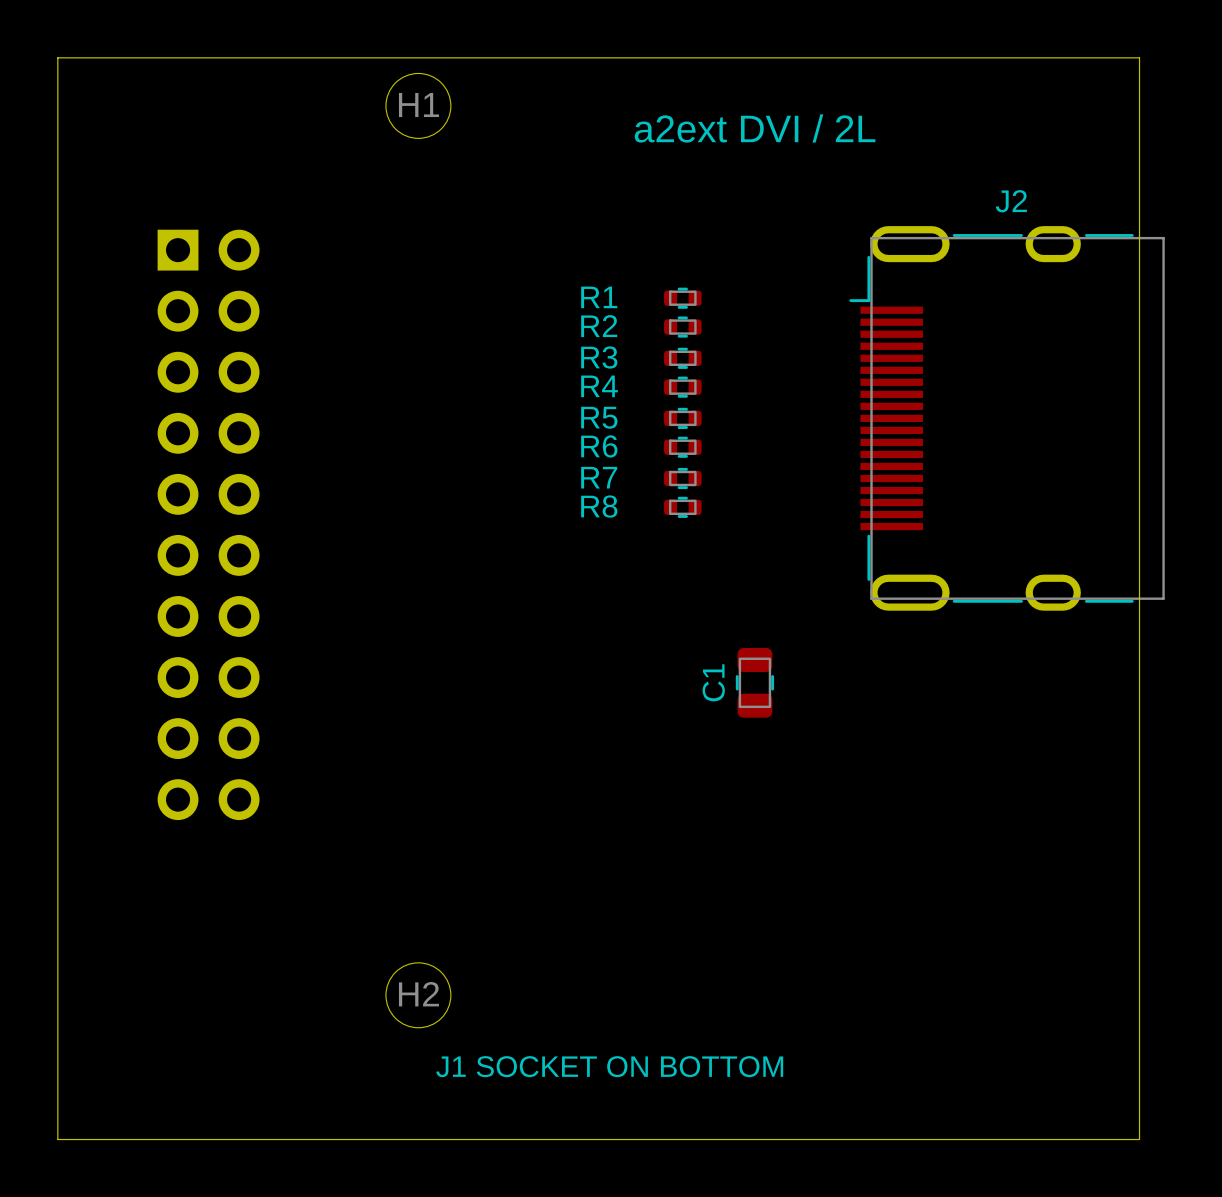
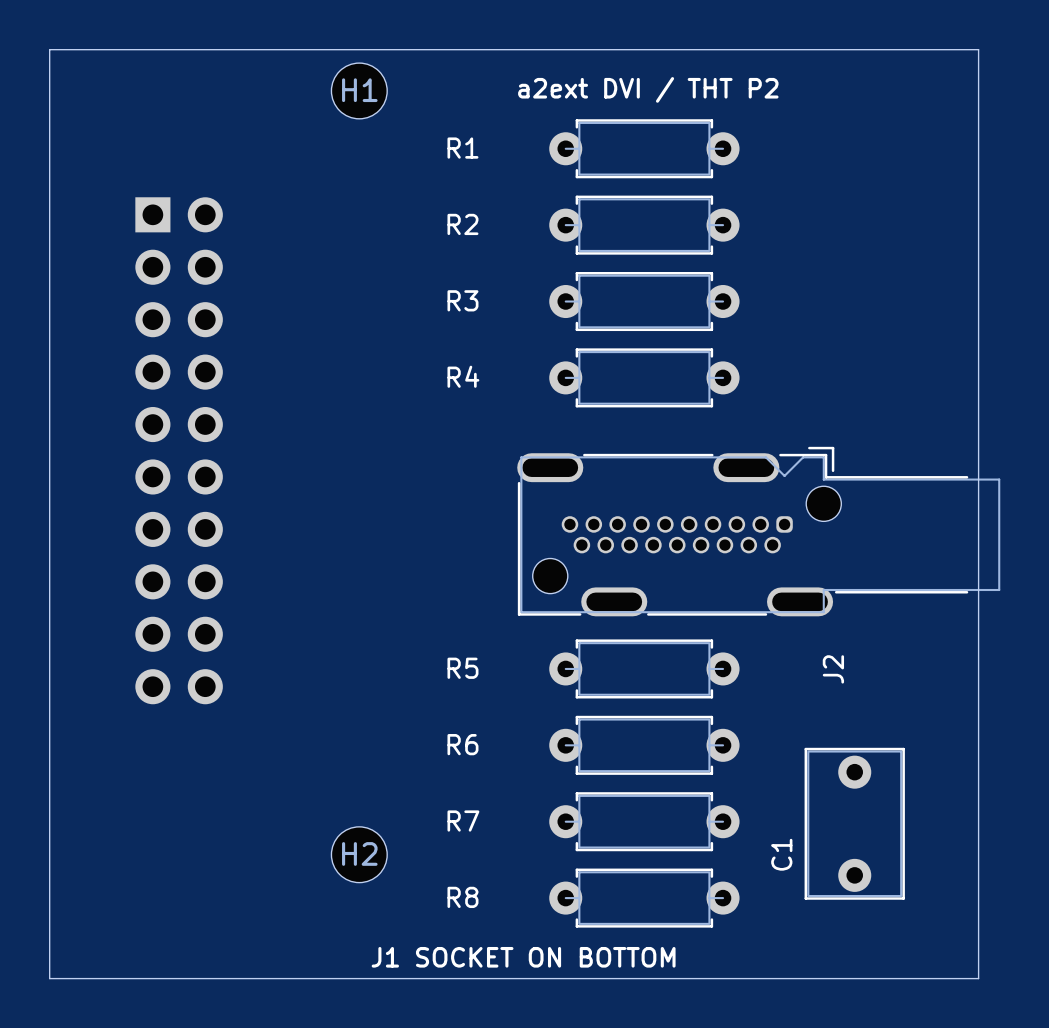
text: a2ext DVI / 2L (755, 128) -> a2ext DVI / THT P2 (648, 89)
J2 name position: J2 (1011, 201) -> J2 (833, 669)
J2 footprint: [849, 226, 1165, 611] -> [517, 446, 1001, 617]
R1 footprint: [664, 287, 702, 309] -> [549, 119, 740, 179]
R1 name position: R1 (599, 297) -> R1 (462, 148)
R2 footprint: [664, 316, 702, 338] -> [549, 195, 740, 255]
R2 name position: R2 (599, 326) -> R2 (462, 224)
R3 footprint: [664, 347, 702, 369] -> [549, 271, 740, 332]
R3 name position: R3 (599, 357) -> R3 (462, 300)
R4 footprint: [664, 376, 702, 398] -> [549, 348, 740, 408]
R4 name position: R4 (599, 386) -> R4 (463, 376)
R5 footprint: [664, 407, 702, 429] -> [549, 639, 740, 699]
R5 name position: R5 (599, 417) -> R5 (462, 668)
R6 footprint: [664, 436, 702, 458] -> [549, 715, 740, 775]
R6 name position: R6 (599, 446) -> R6 (462, 744)
R7 footprint: [664, 467, 702, 490] -> [549, 792, 740, 852]
R7 name position: R7 (599, 477) -> R7 (463, 821)
R8 footprint: [664, 496, 702, 518] -> [549, 868, 740, 928]
R8 name position: R8 (599, 506) -> R8 (462, 897)
C1 footprint: [735, 647, 775, 718] -> [804, 747, 905, 900]
C1 name position: C1 (713, 682) -> C1 (781, 854)
text position: J1 SOCKET ON BOTTOM (609, 1066) -> J1 SOCKET ON BOTTOM (523, 957)

